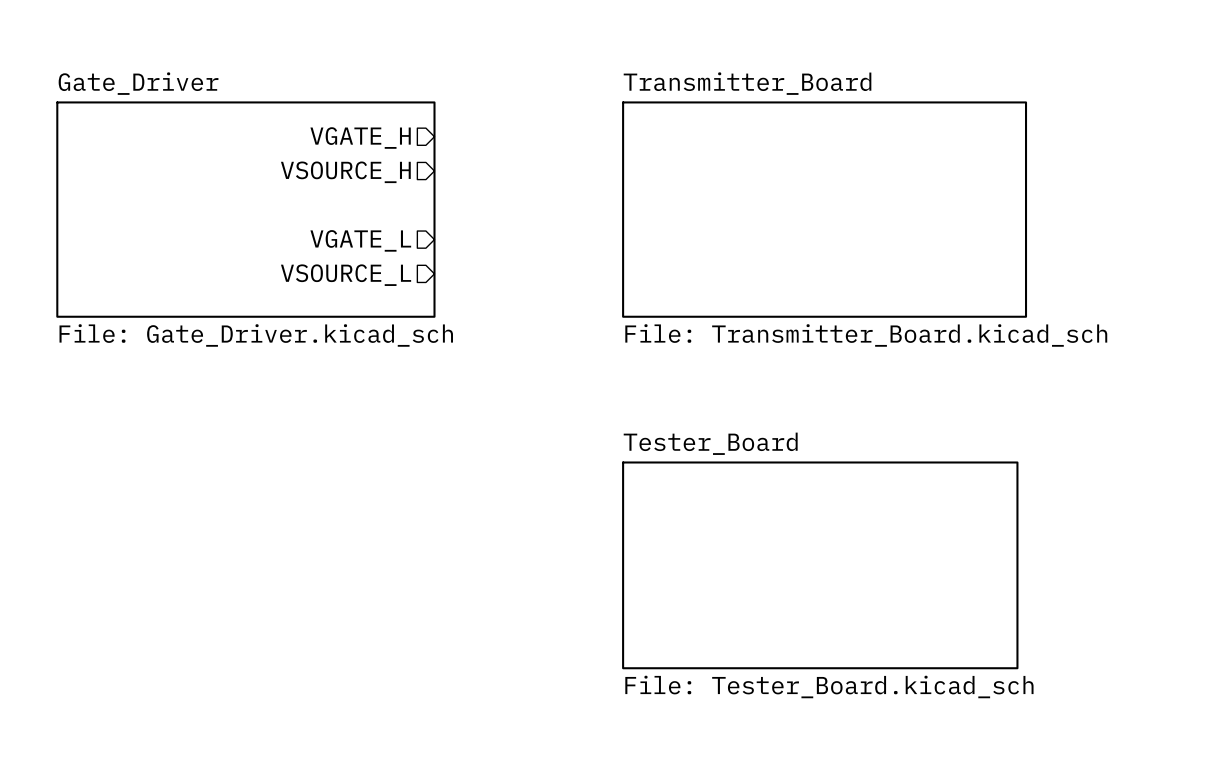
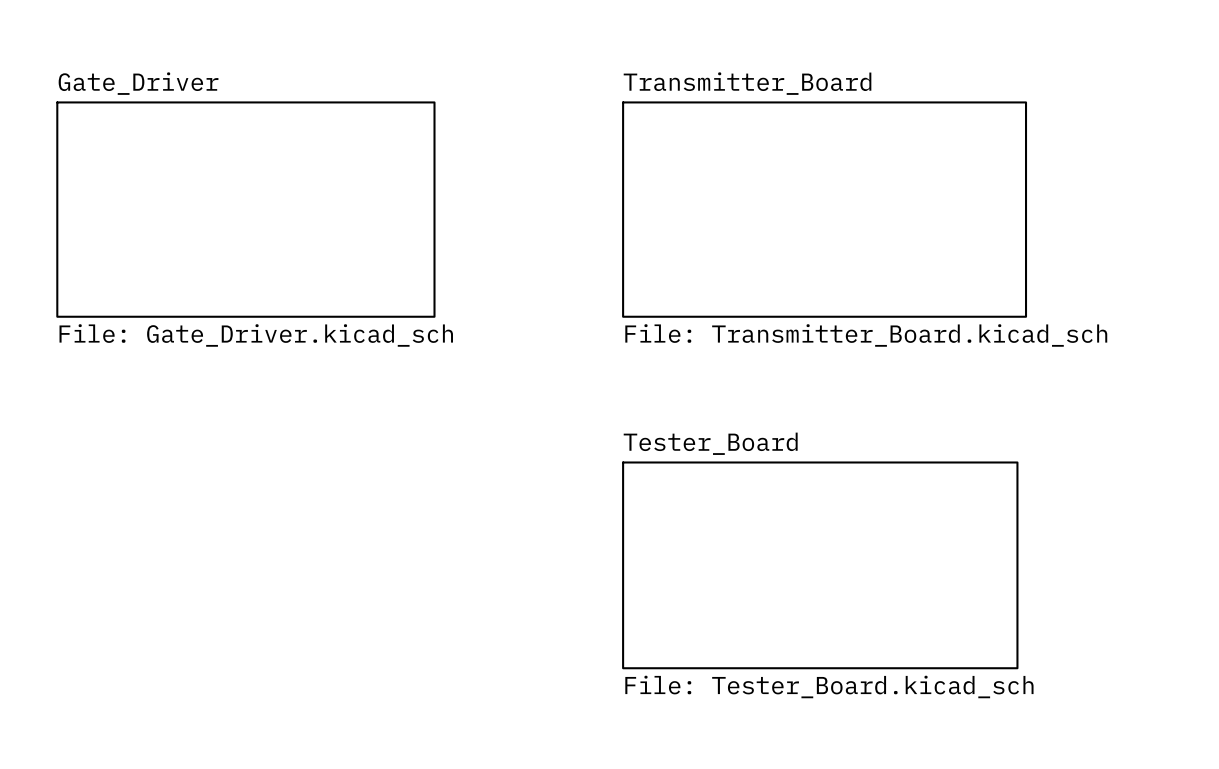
sheet pin: VGATE_H (360, 138) -> none
sheet pin: VSOURCE_H (345, 172) -> none
sheet pin: VGATE_L (360, 240) -> none
sheet pin: VSOURCE_L (346, 275) -> none

